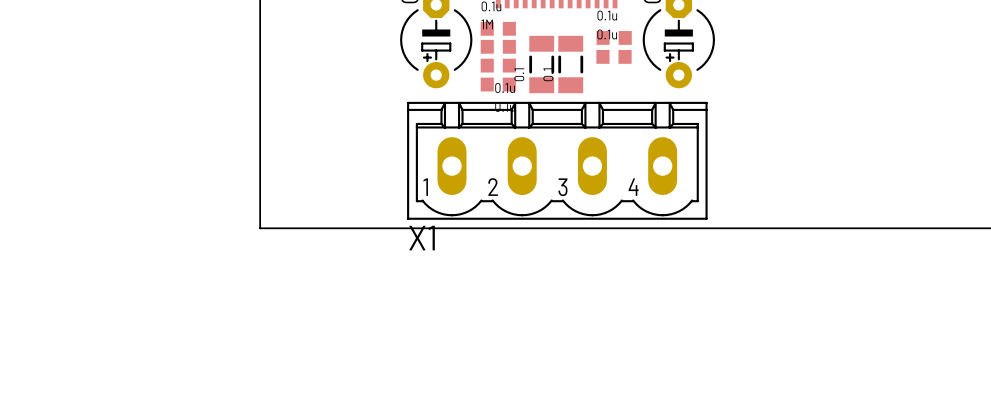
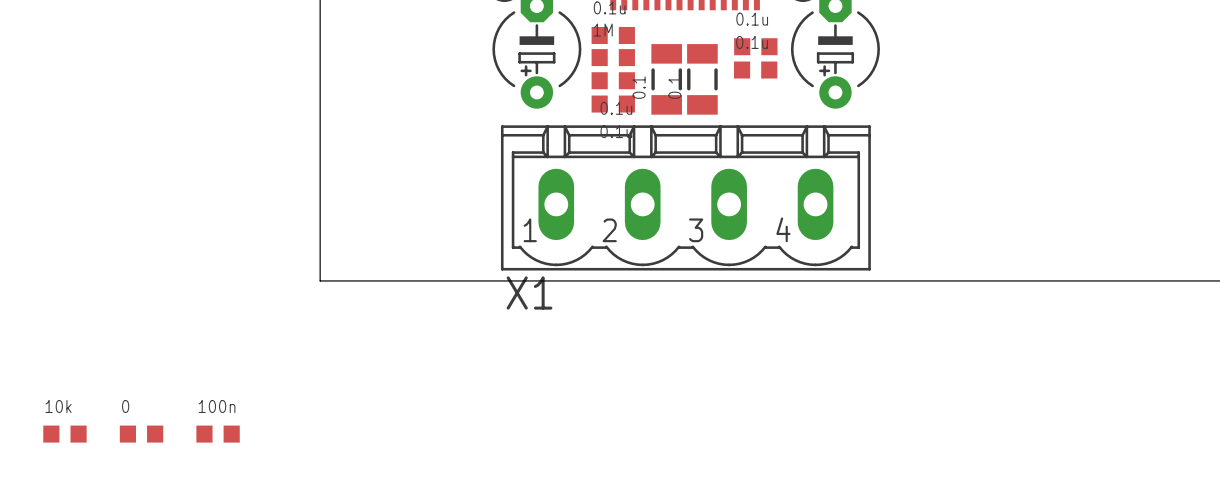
part: none -> 10k (64, 434)
part: none -> 0 (141, 434)
part: none -> 100n (218, 434)

